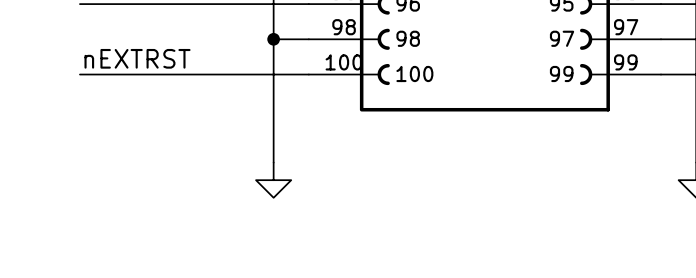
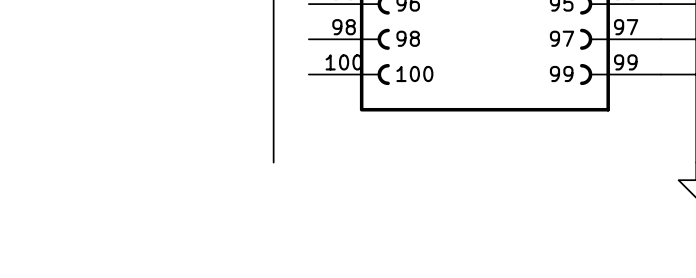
wire: (79, 4) (308, 4) -> none
wire: (273, 39) (308, 39) -> none
junction: (273, 39) -> none
label: nEXTRST (137, 58) -> none
wire: (79, 74) (308, 74) -> none
power symbol: (273, 180) -> none

